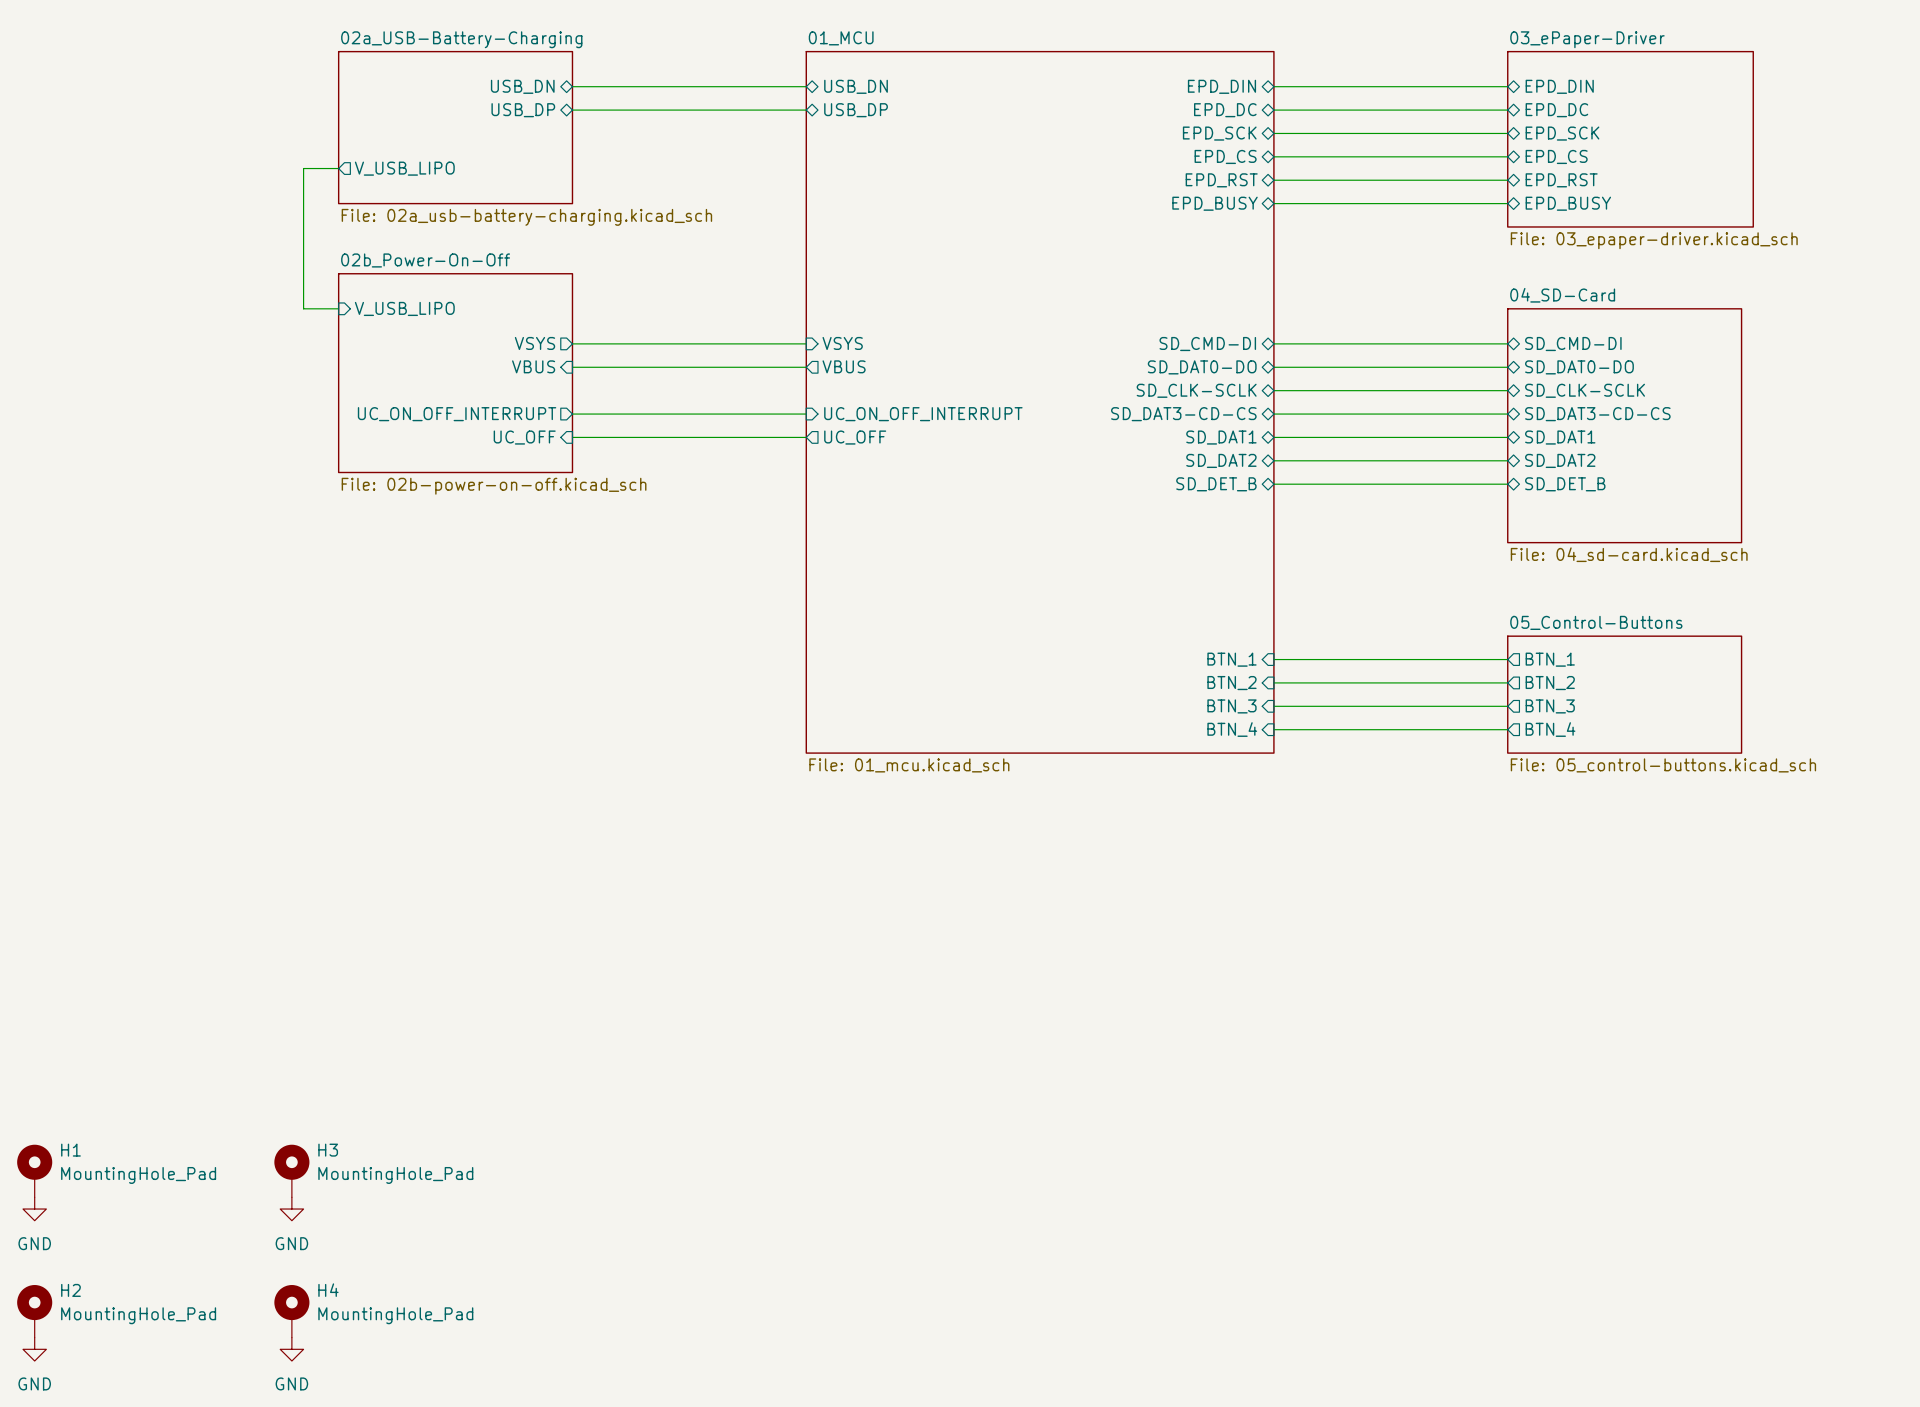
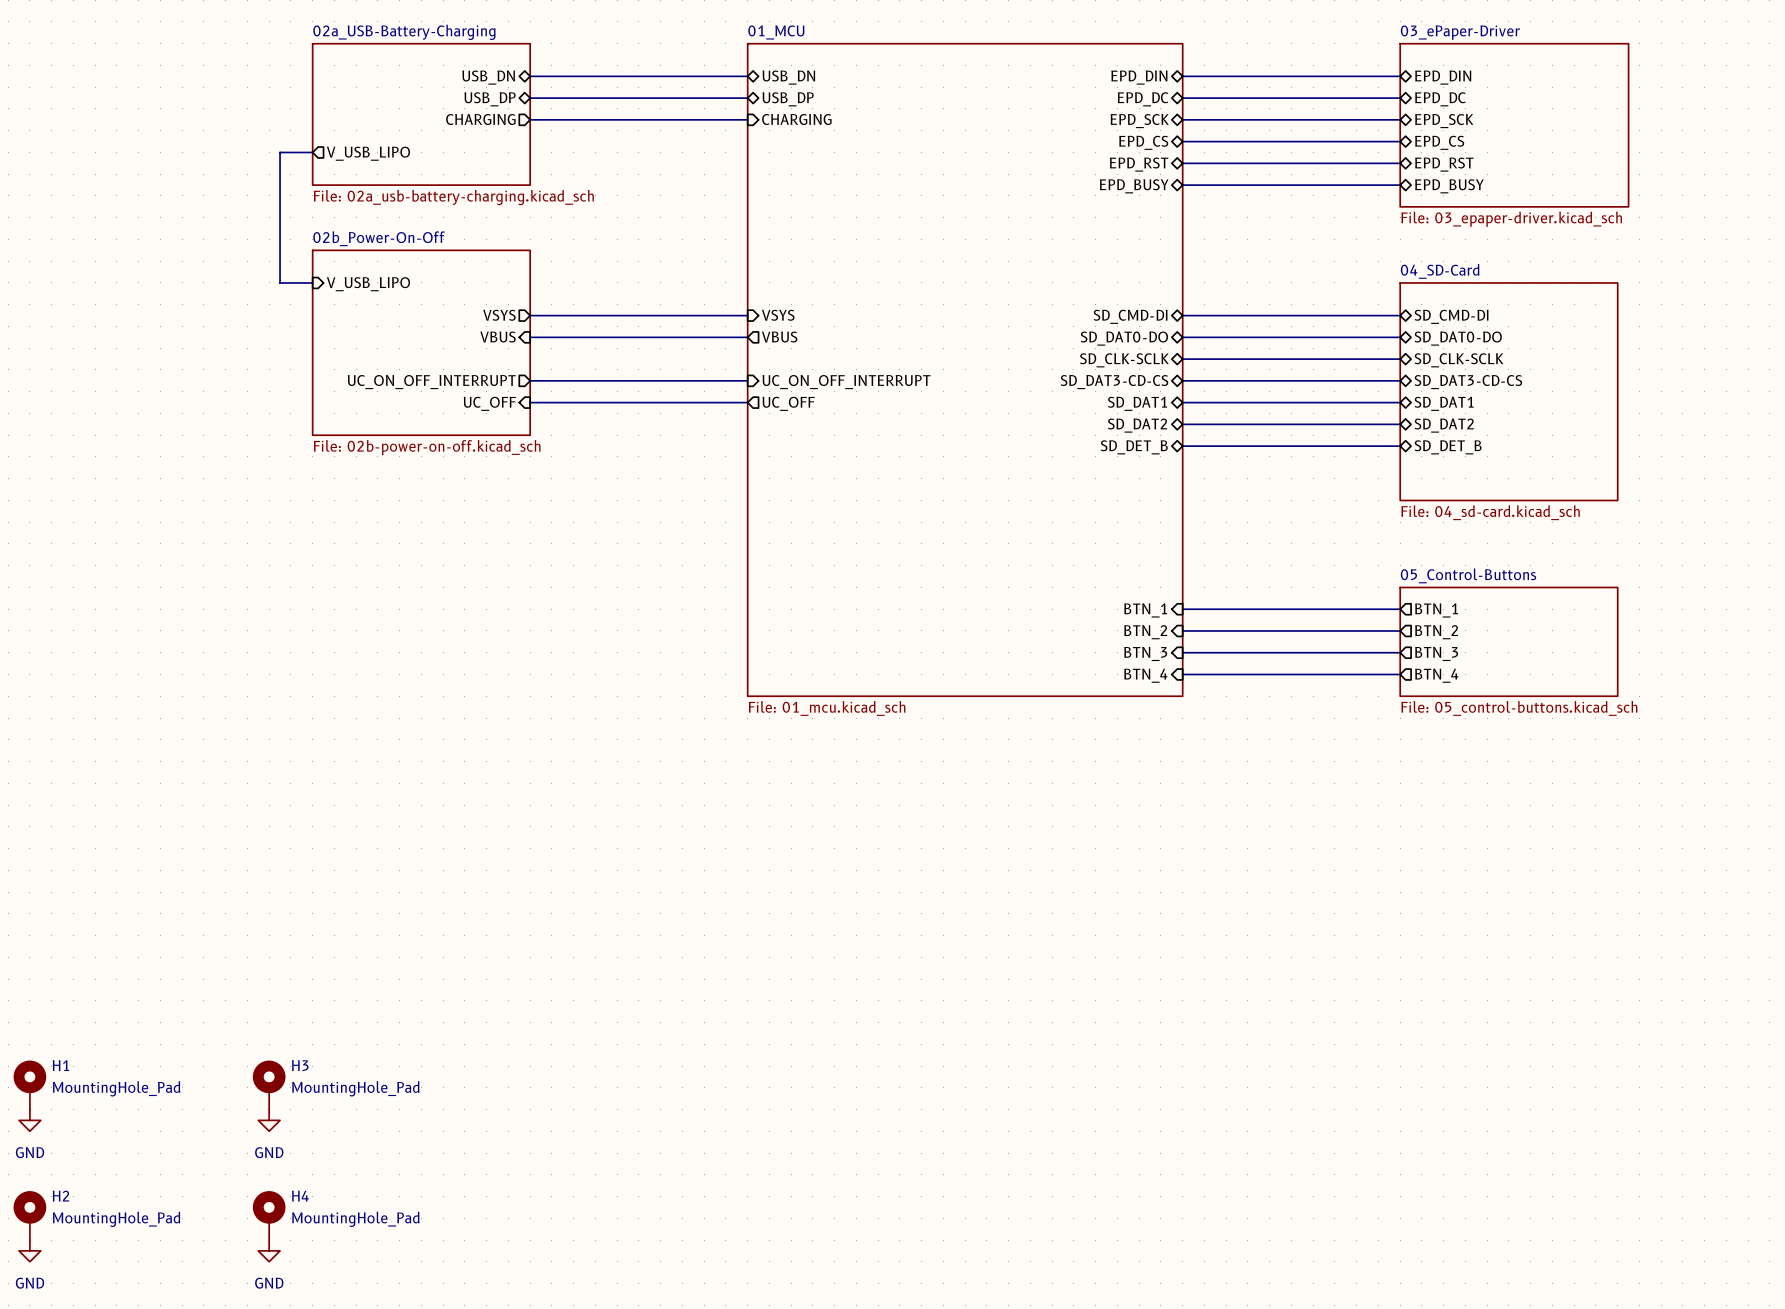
sheet pin: none -> CHARGING (480, 119)
wire: none -> (530, 119) (747, 119)
sheet pin: none -> CHARGING (796, 119)

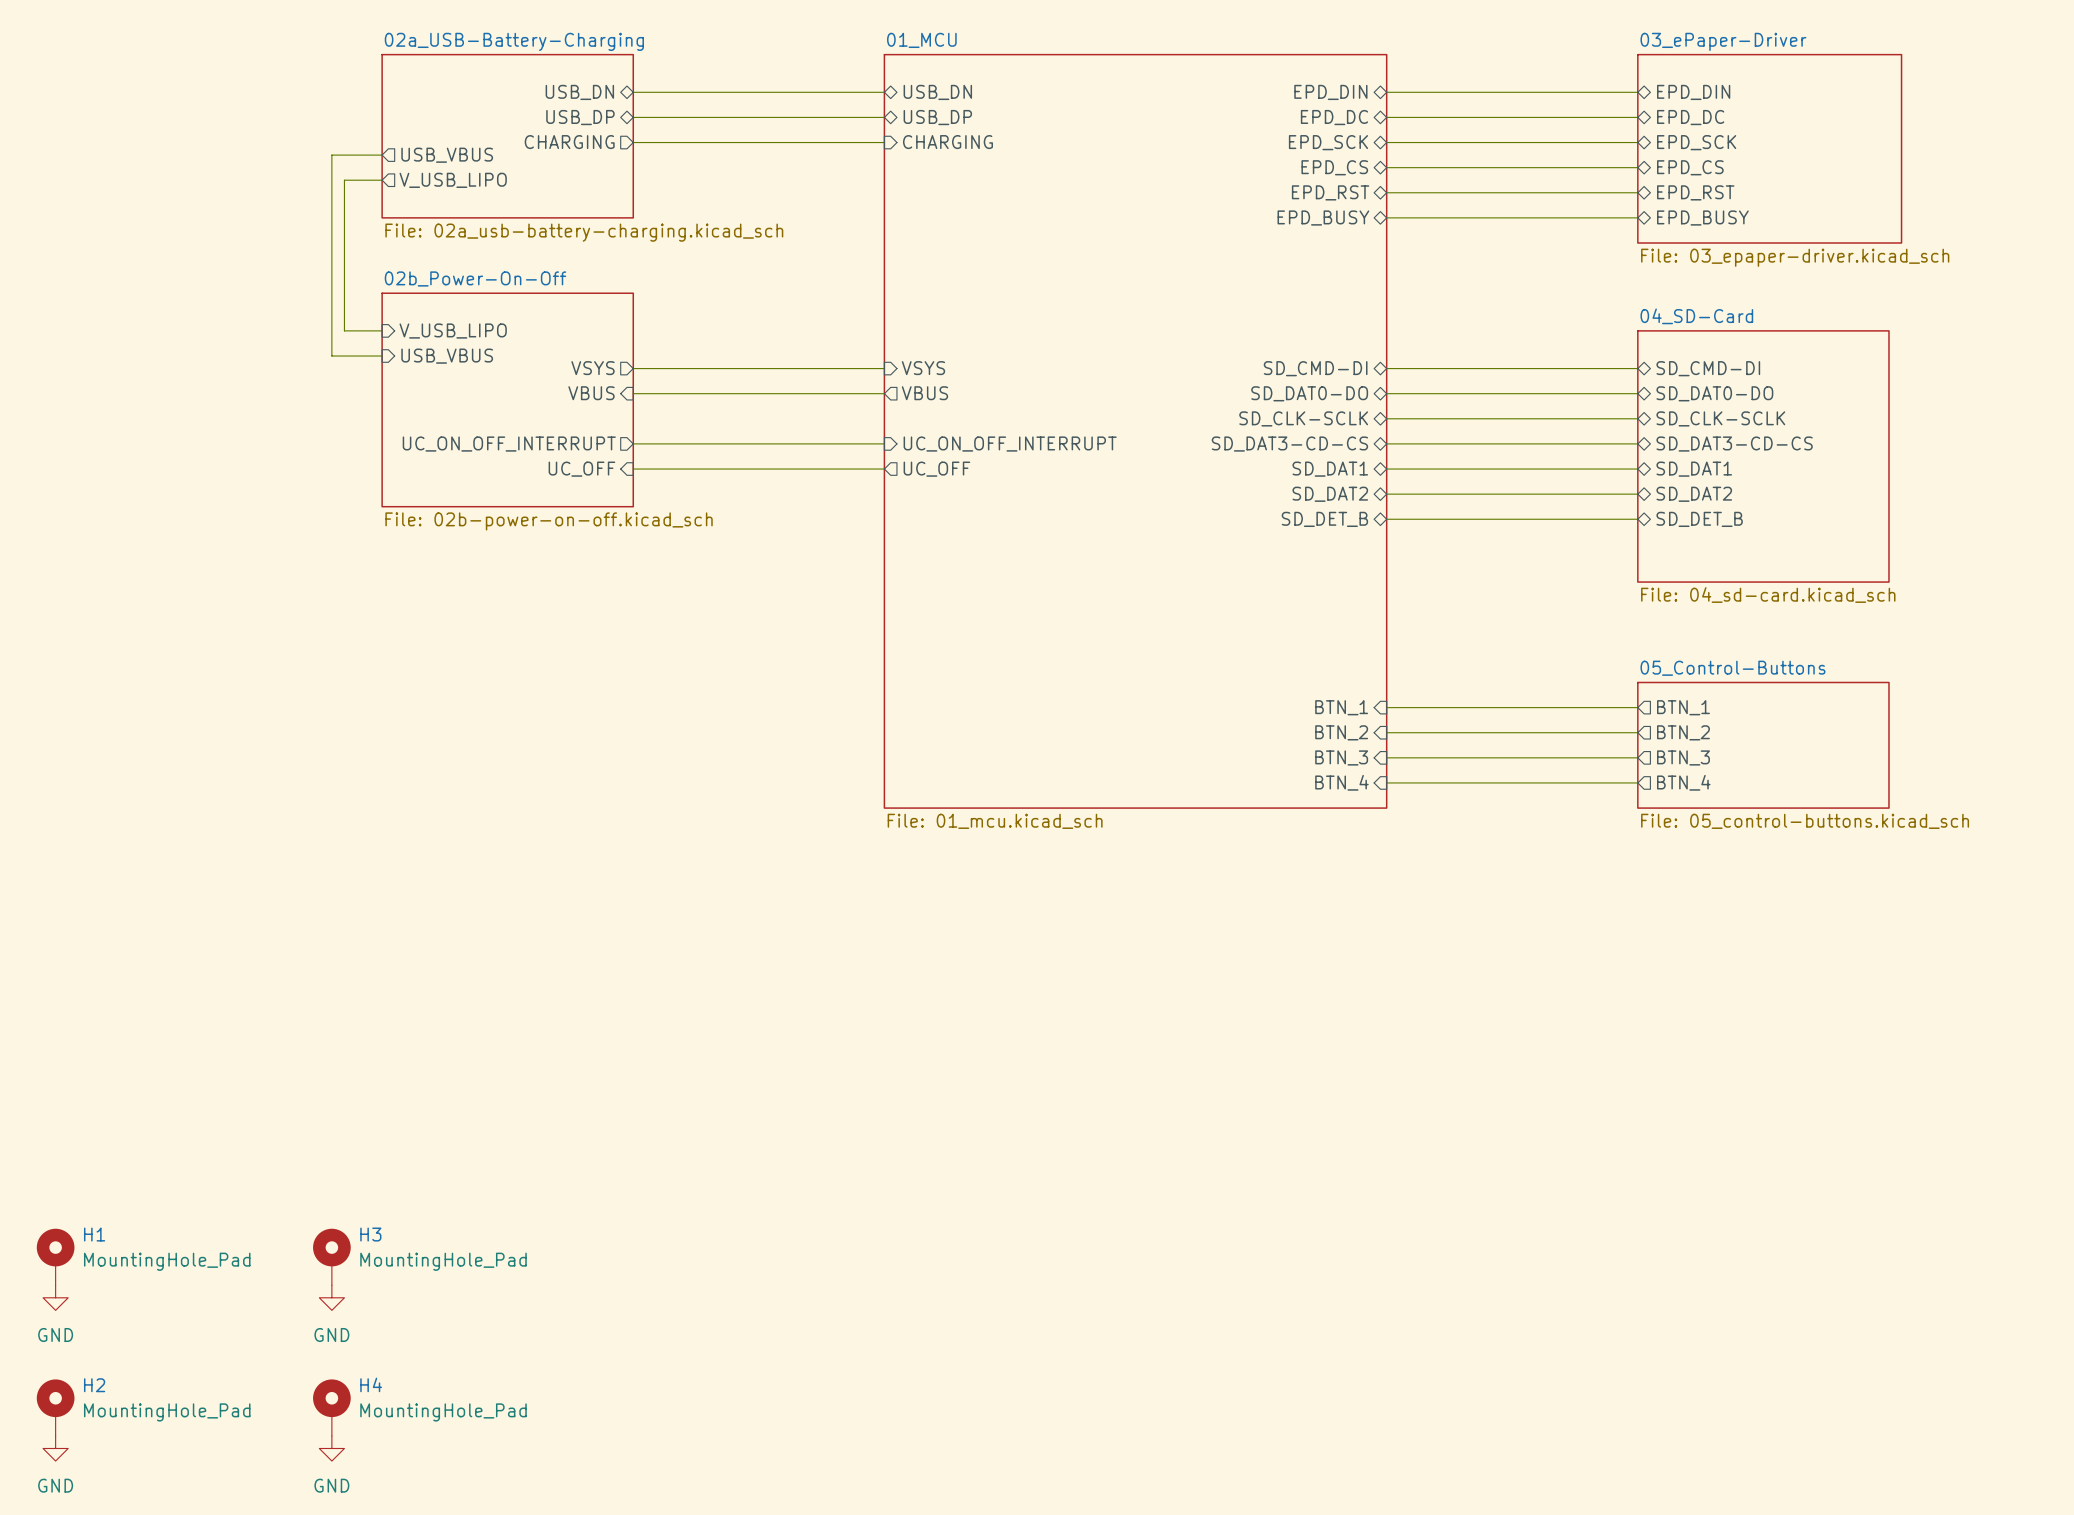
wire: none -> (382, 155) (331, 155) (331, 356) (382, 356)
sheet pin: none -> USB_VBUS (447, 155)
sheet pin: none -> USB_VBUS (447, 356)

